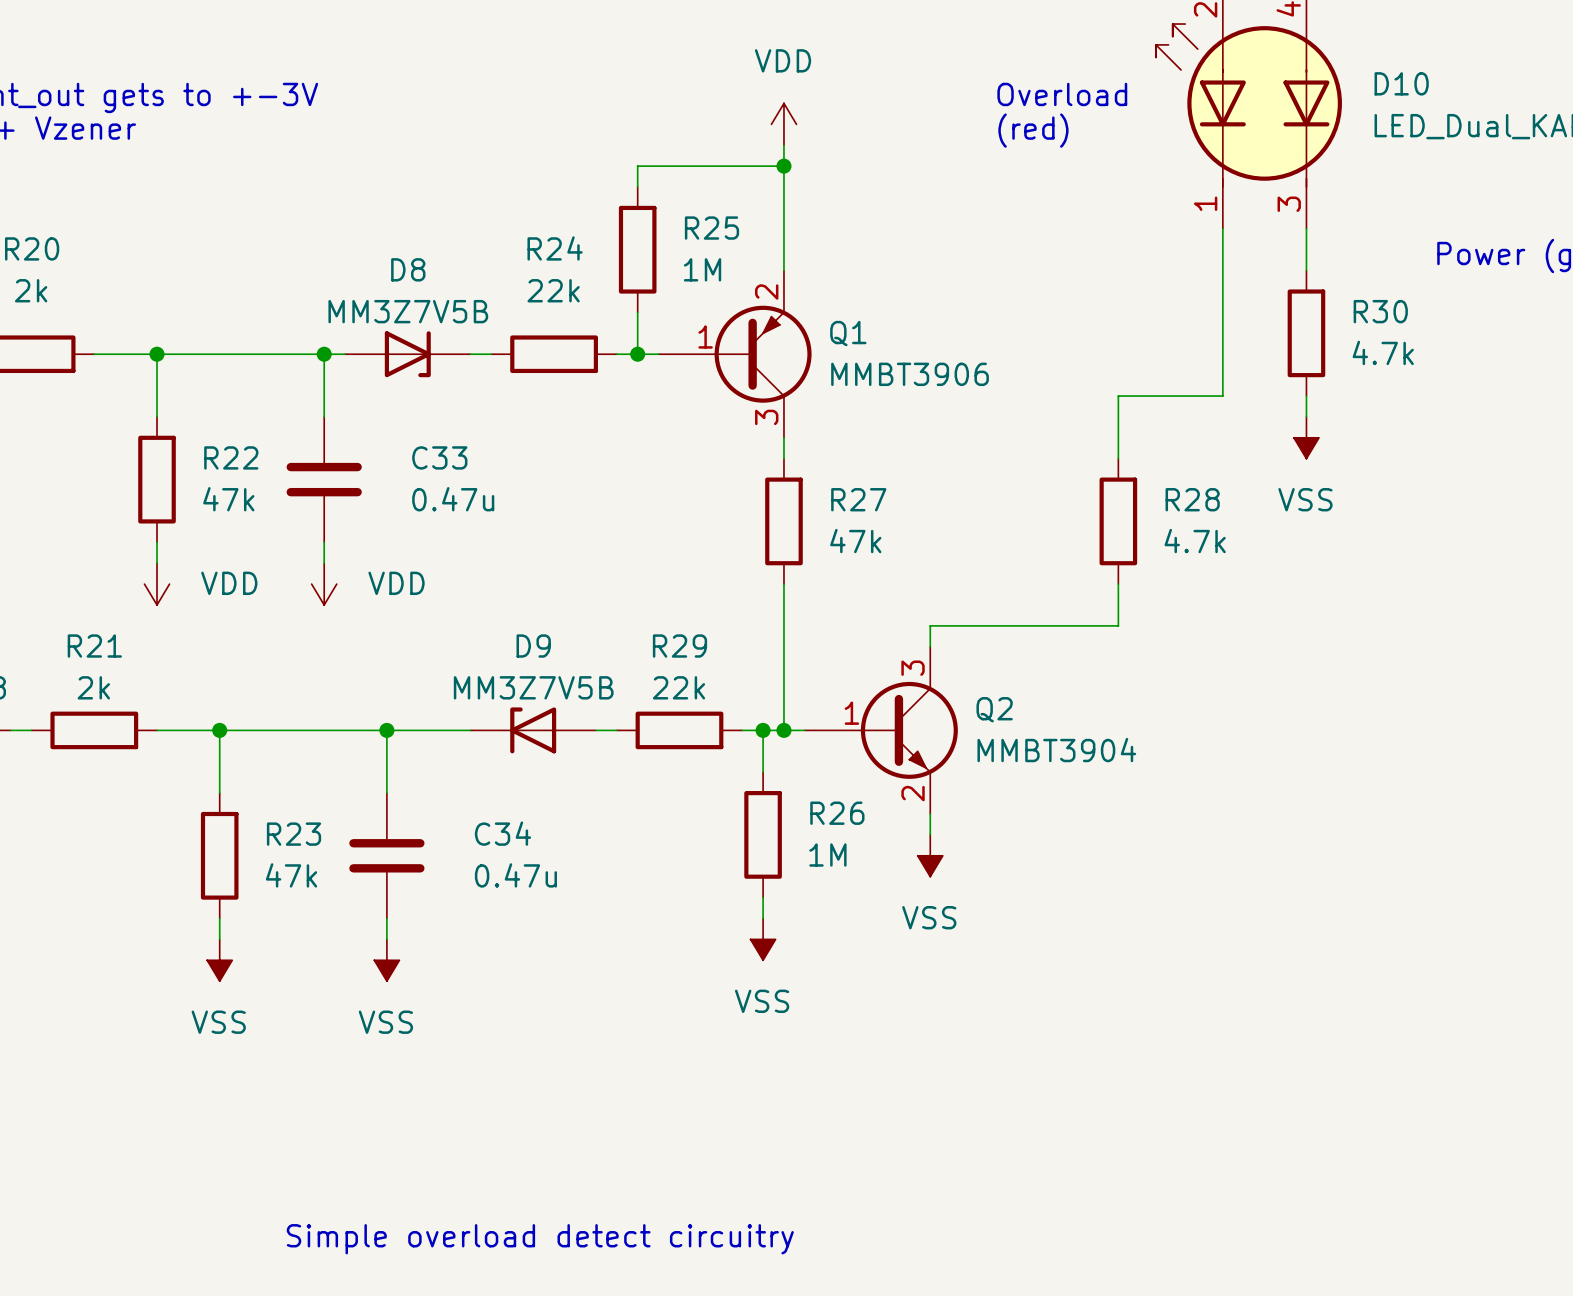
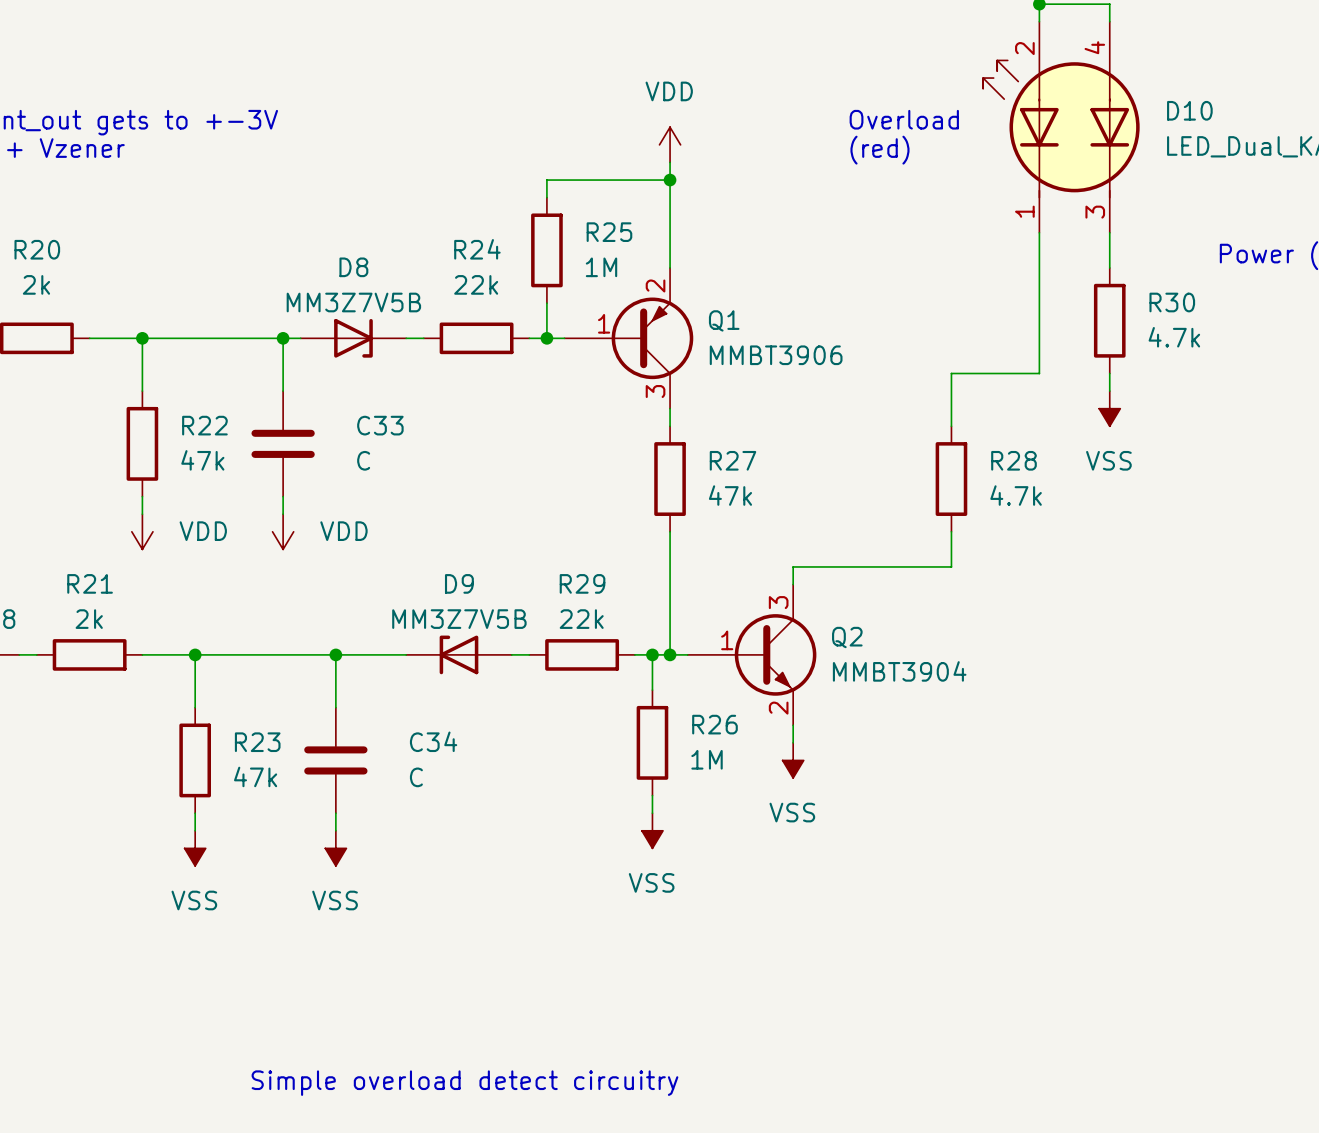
C33 value: 0.47u (453, 499) -> C (363, 460)
C34 value: 0.47u (515, 875) -> C (416, 777)

